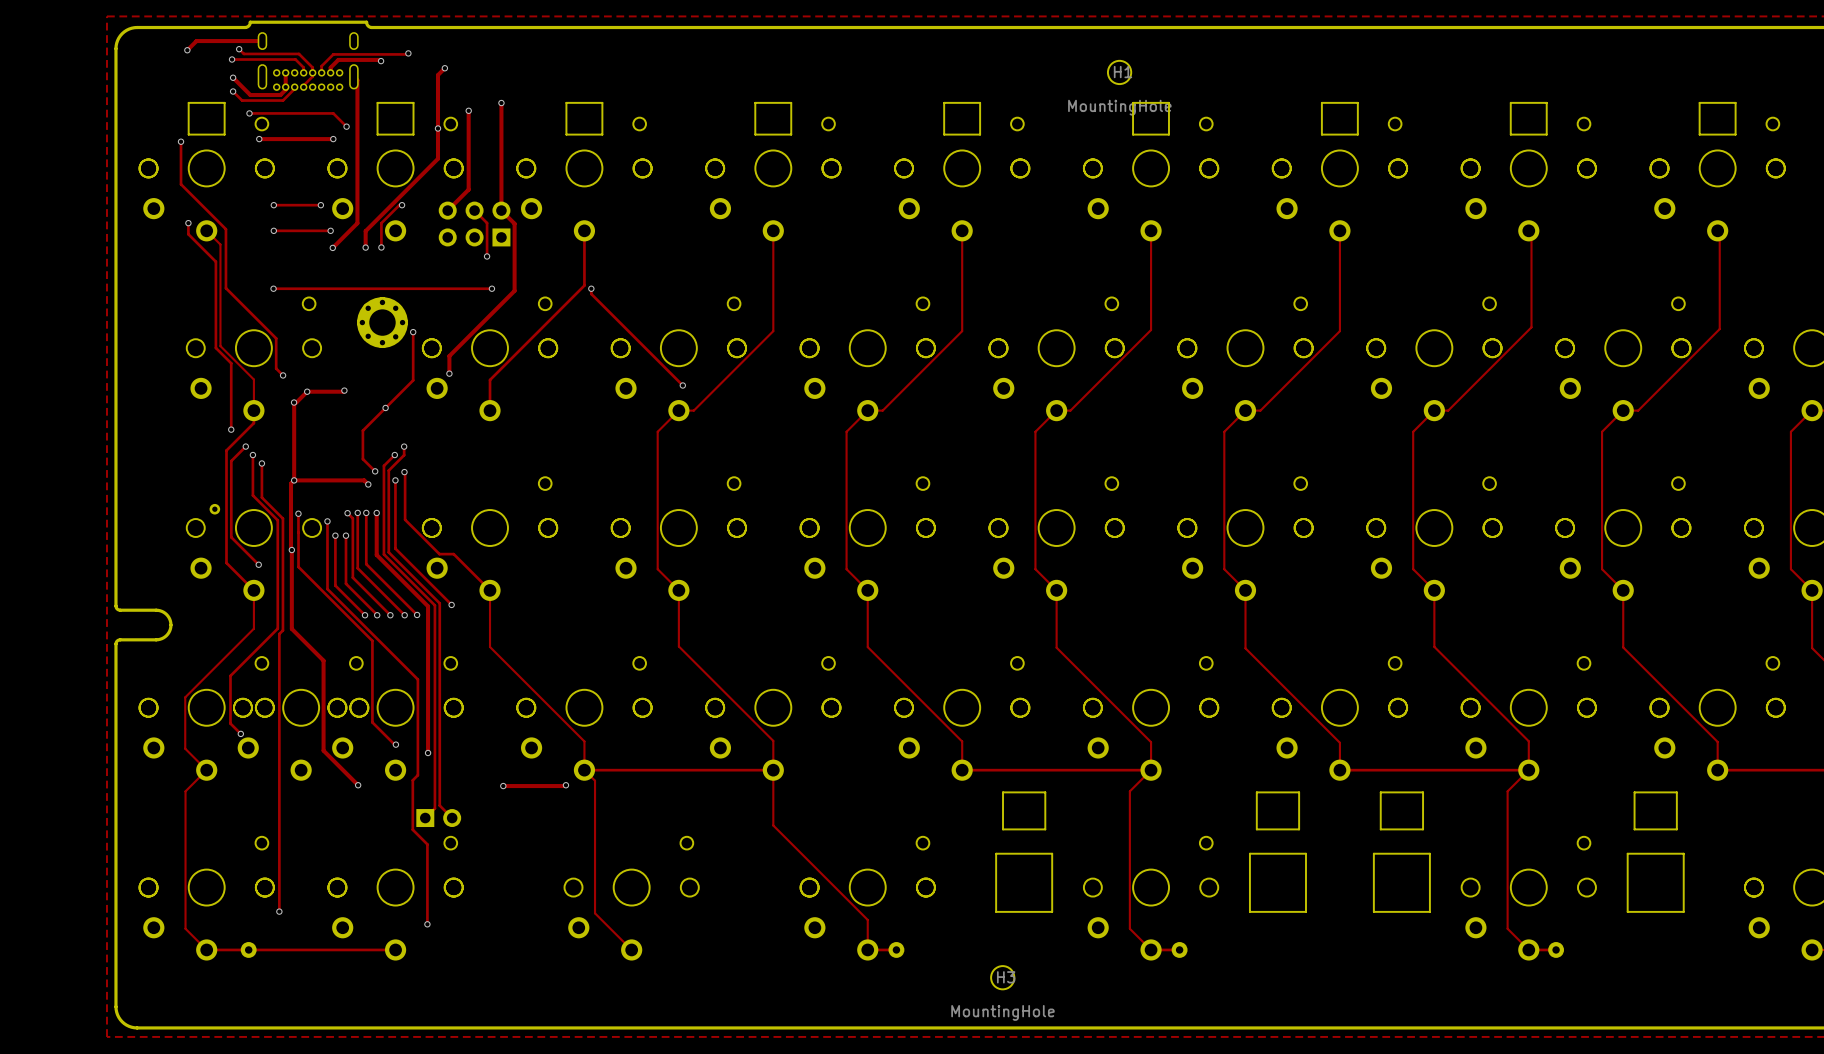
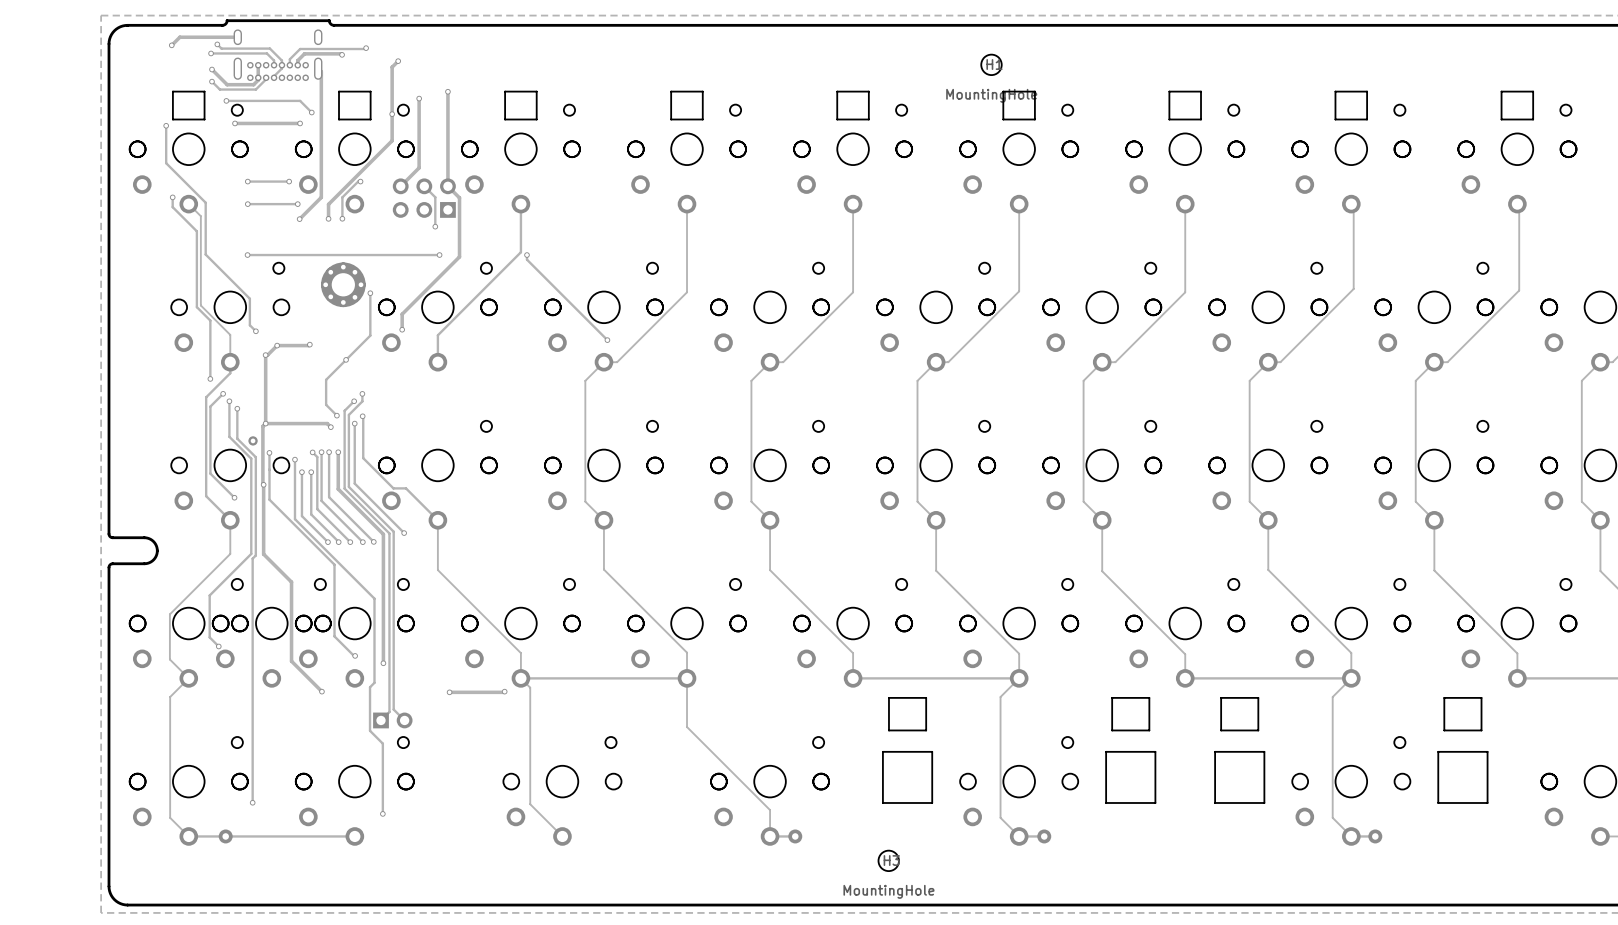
part position: (214, 509) -> (253, 440)

